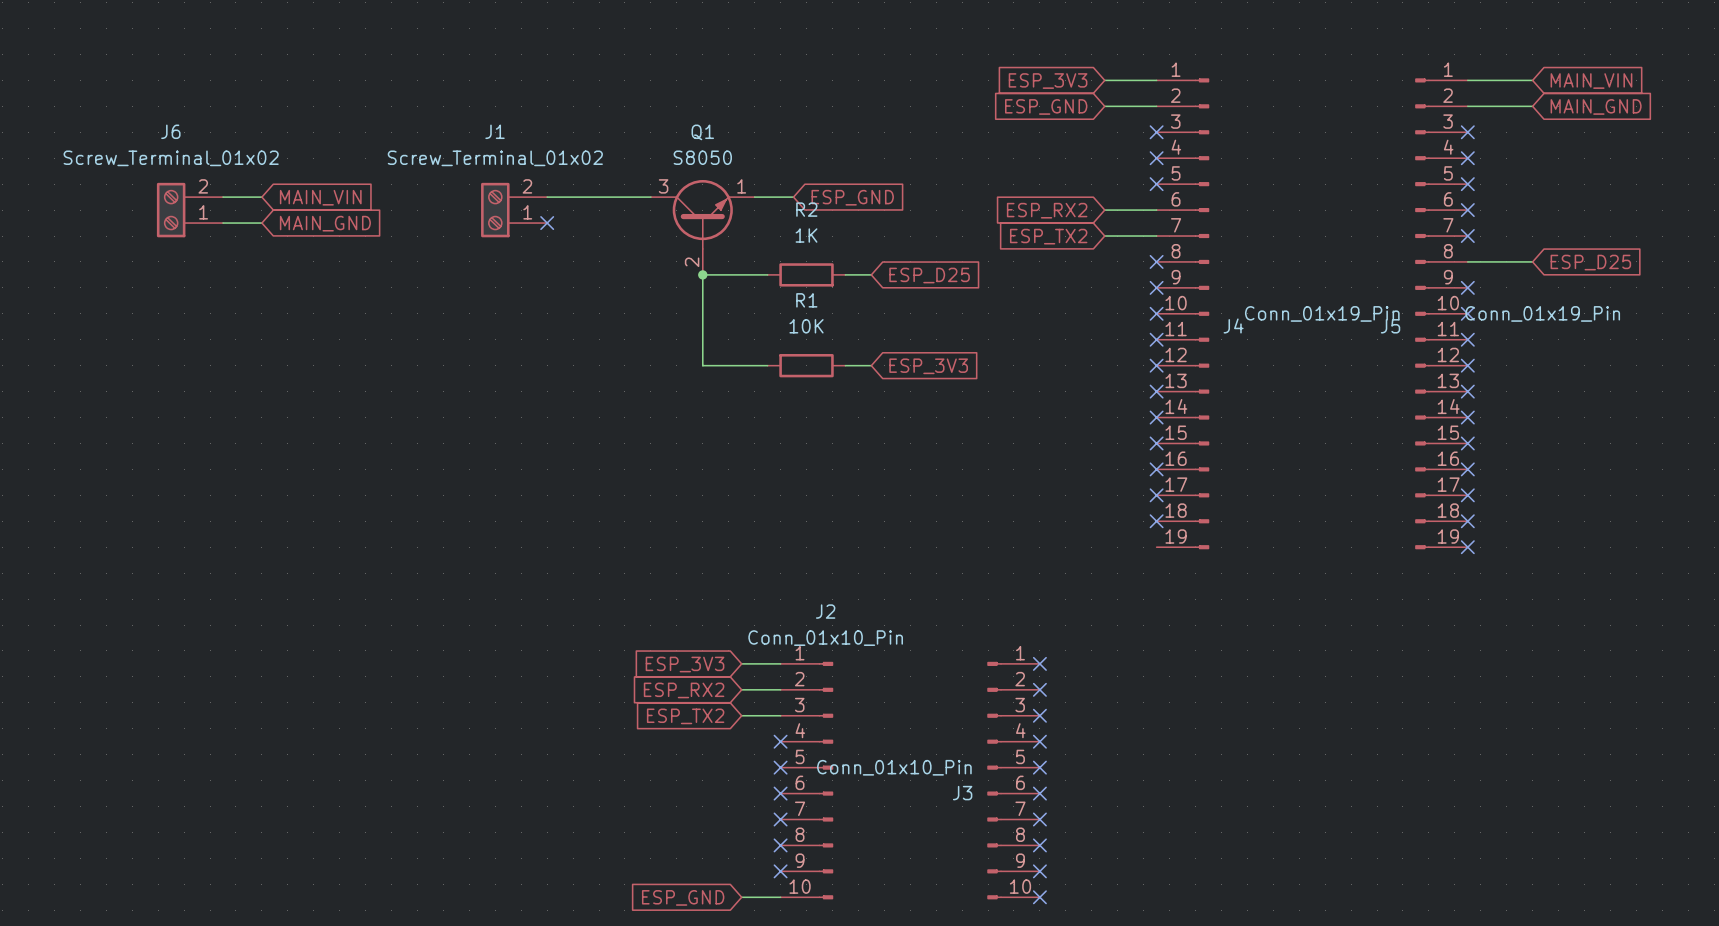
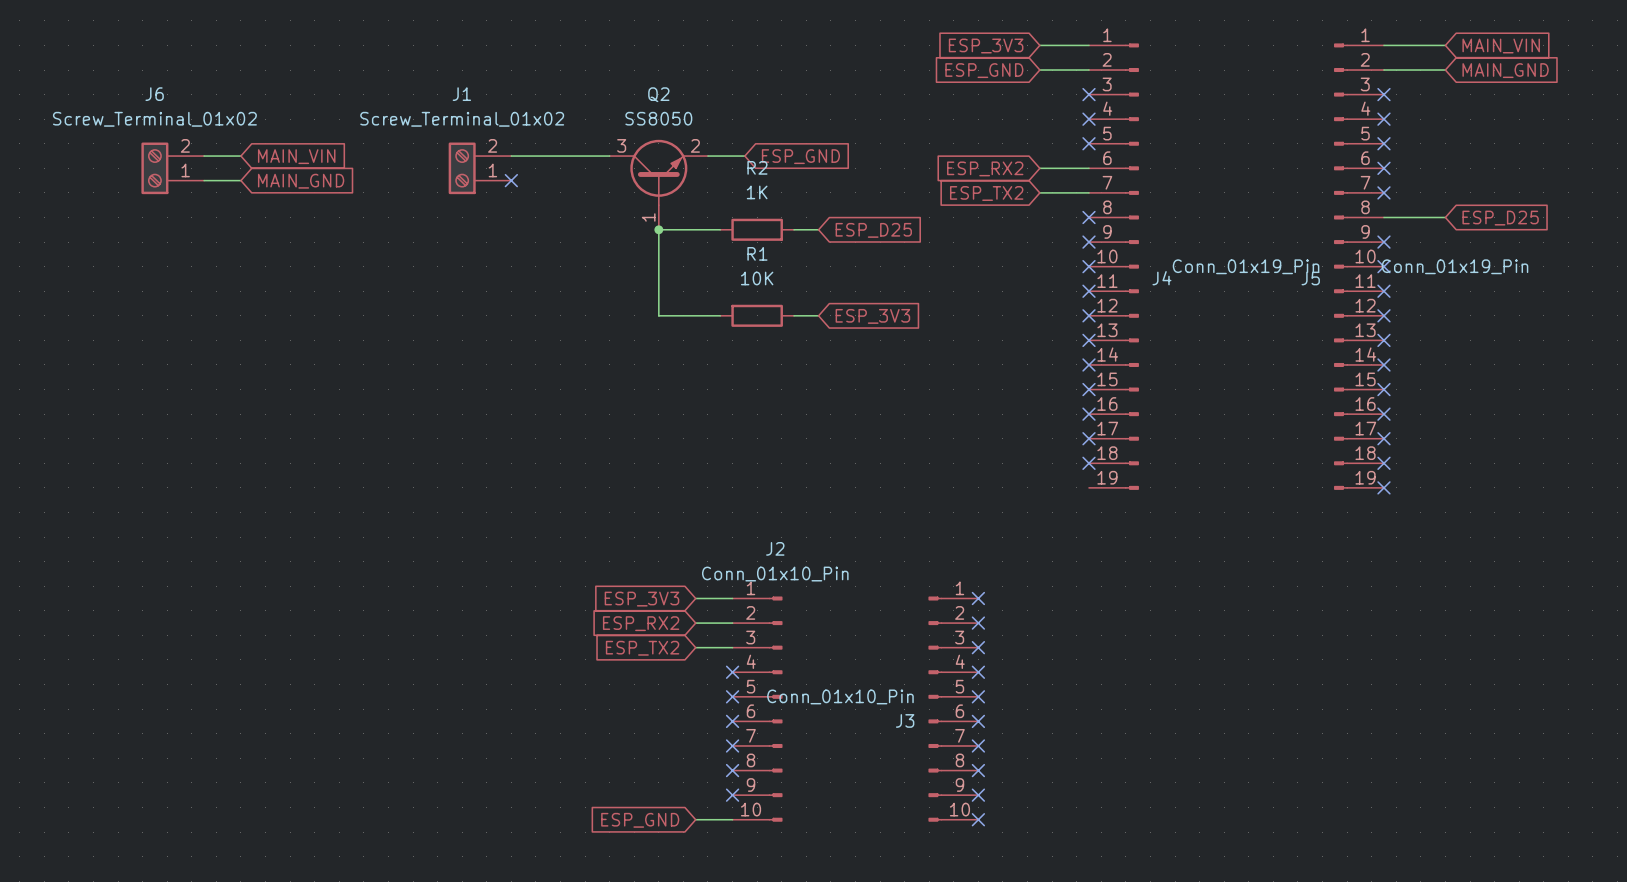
Q1 name: Q1 (702, 132) -> Q2 (658, 94)
Q1 value: S8050 (702, 157) -> SS8050 (658, 118)
Q1 pin number: 1 (741, 186) -> 2 (695, 145)
Q1 pin number: 2 (692, 262) -> 1 (648, 217)

